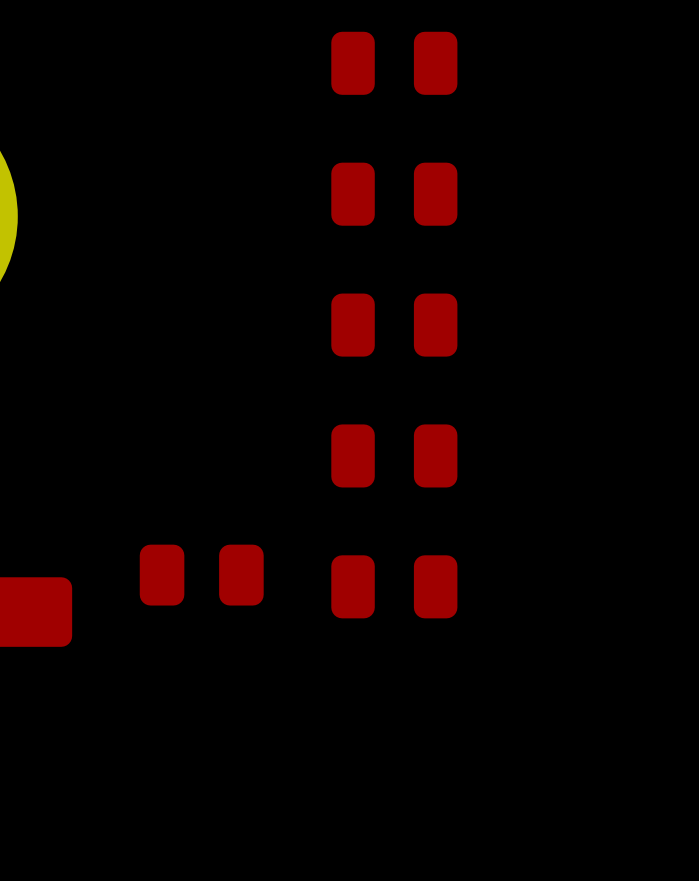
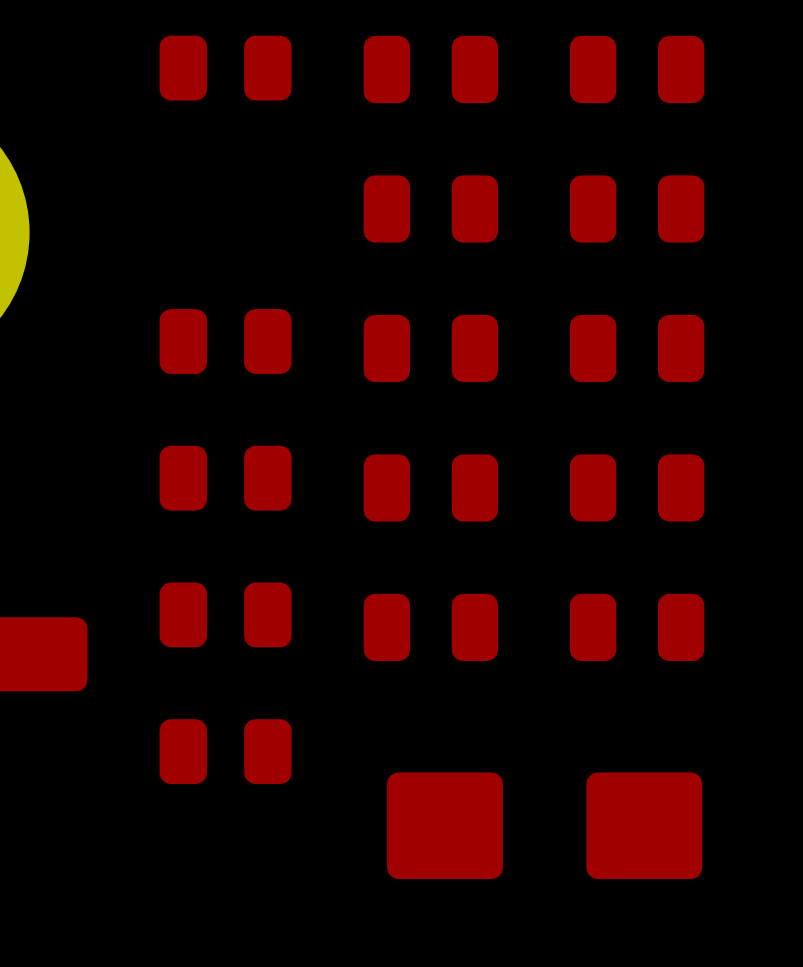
part: none -> (225, 68)
part: none -> (637, 69)
part: none -> (637, 208)
part: none -> (225, 341)
part: none -> (637, 348)
part: none -> (225, 478)
part: none -> (637, 487)
part: none -> (637, 627)
part: none -> (225, 751)
part: none -> (544, 825)

